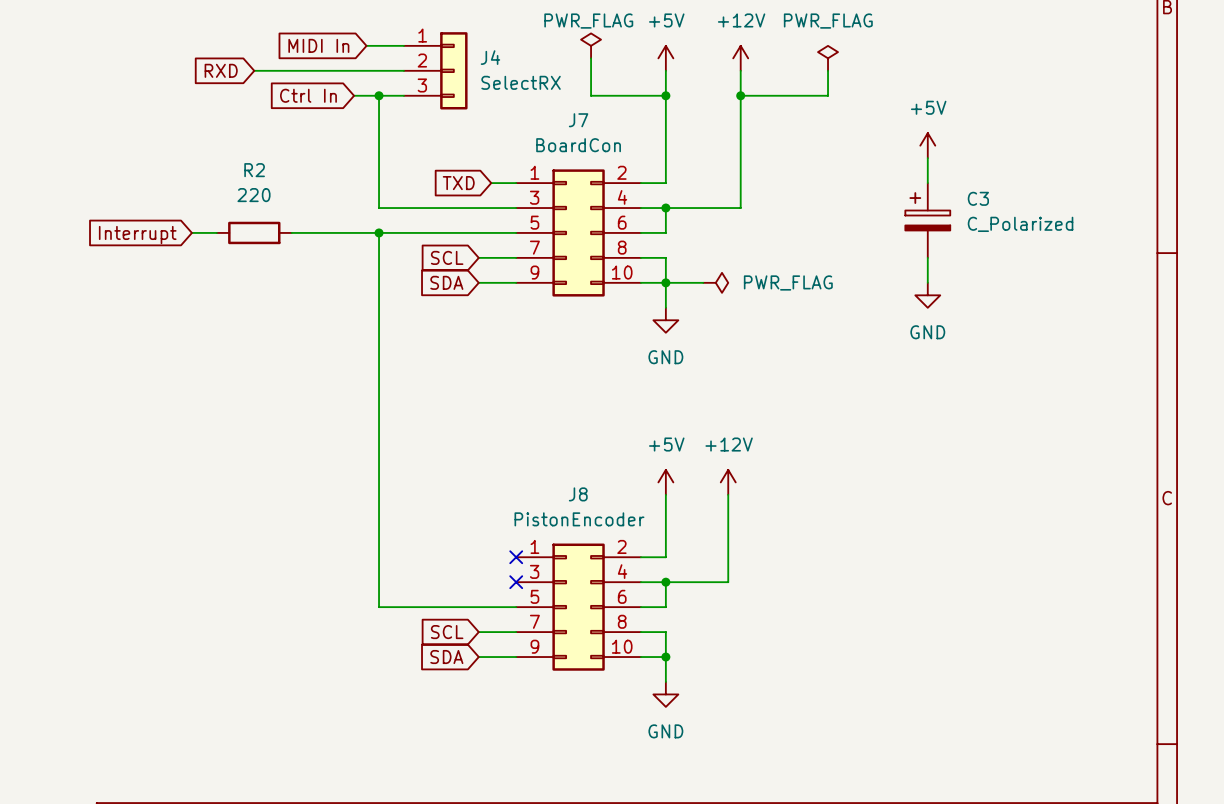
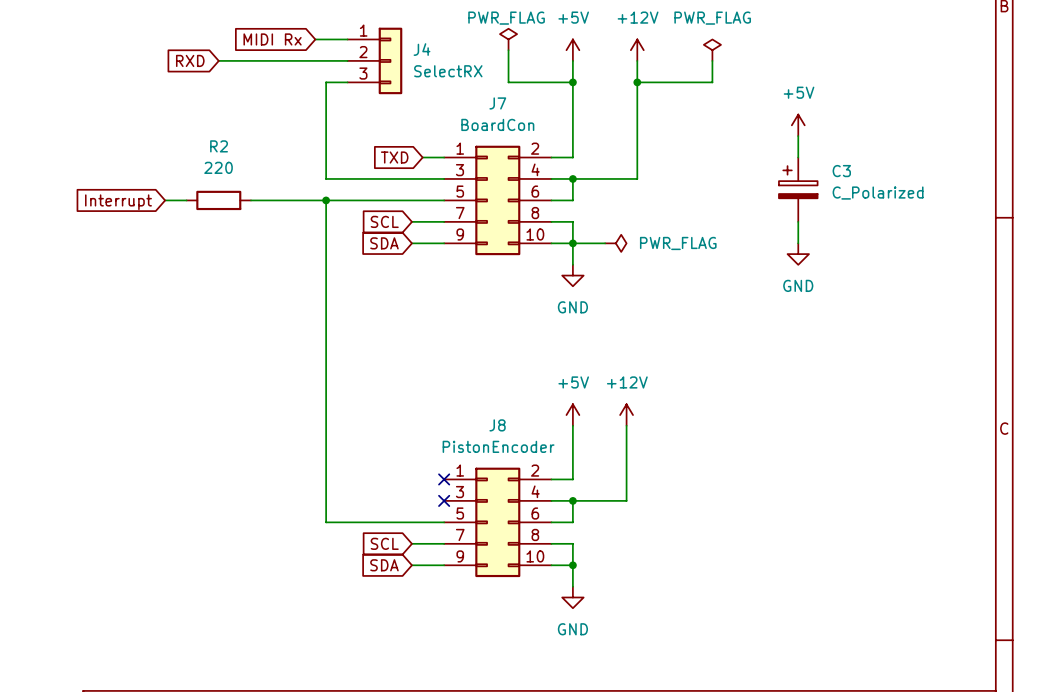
global label: MIDI In (318, 45) -> MIDI Rx (272, 39)
global label: Ctrl In (308, 95) -> none
wire: (354, 95) (379, 95) -> none
junction: (379, 95) -> none

